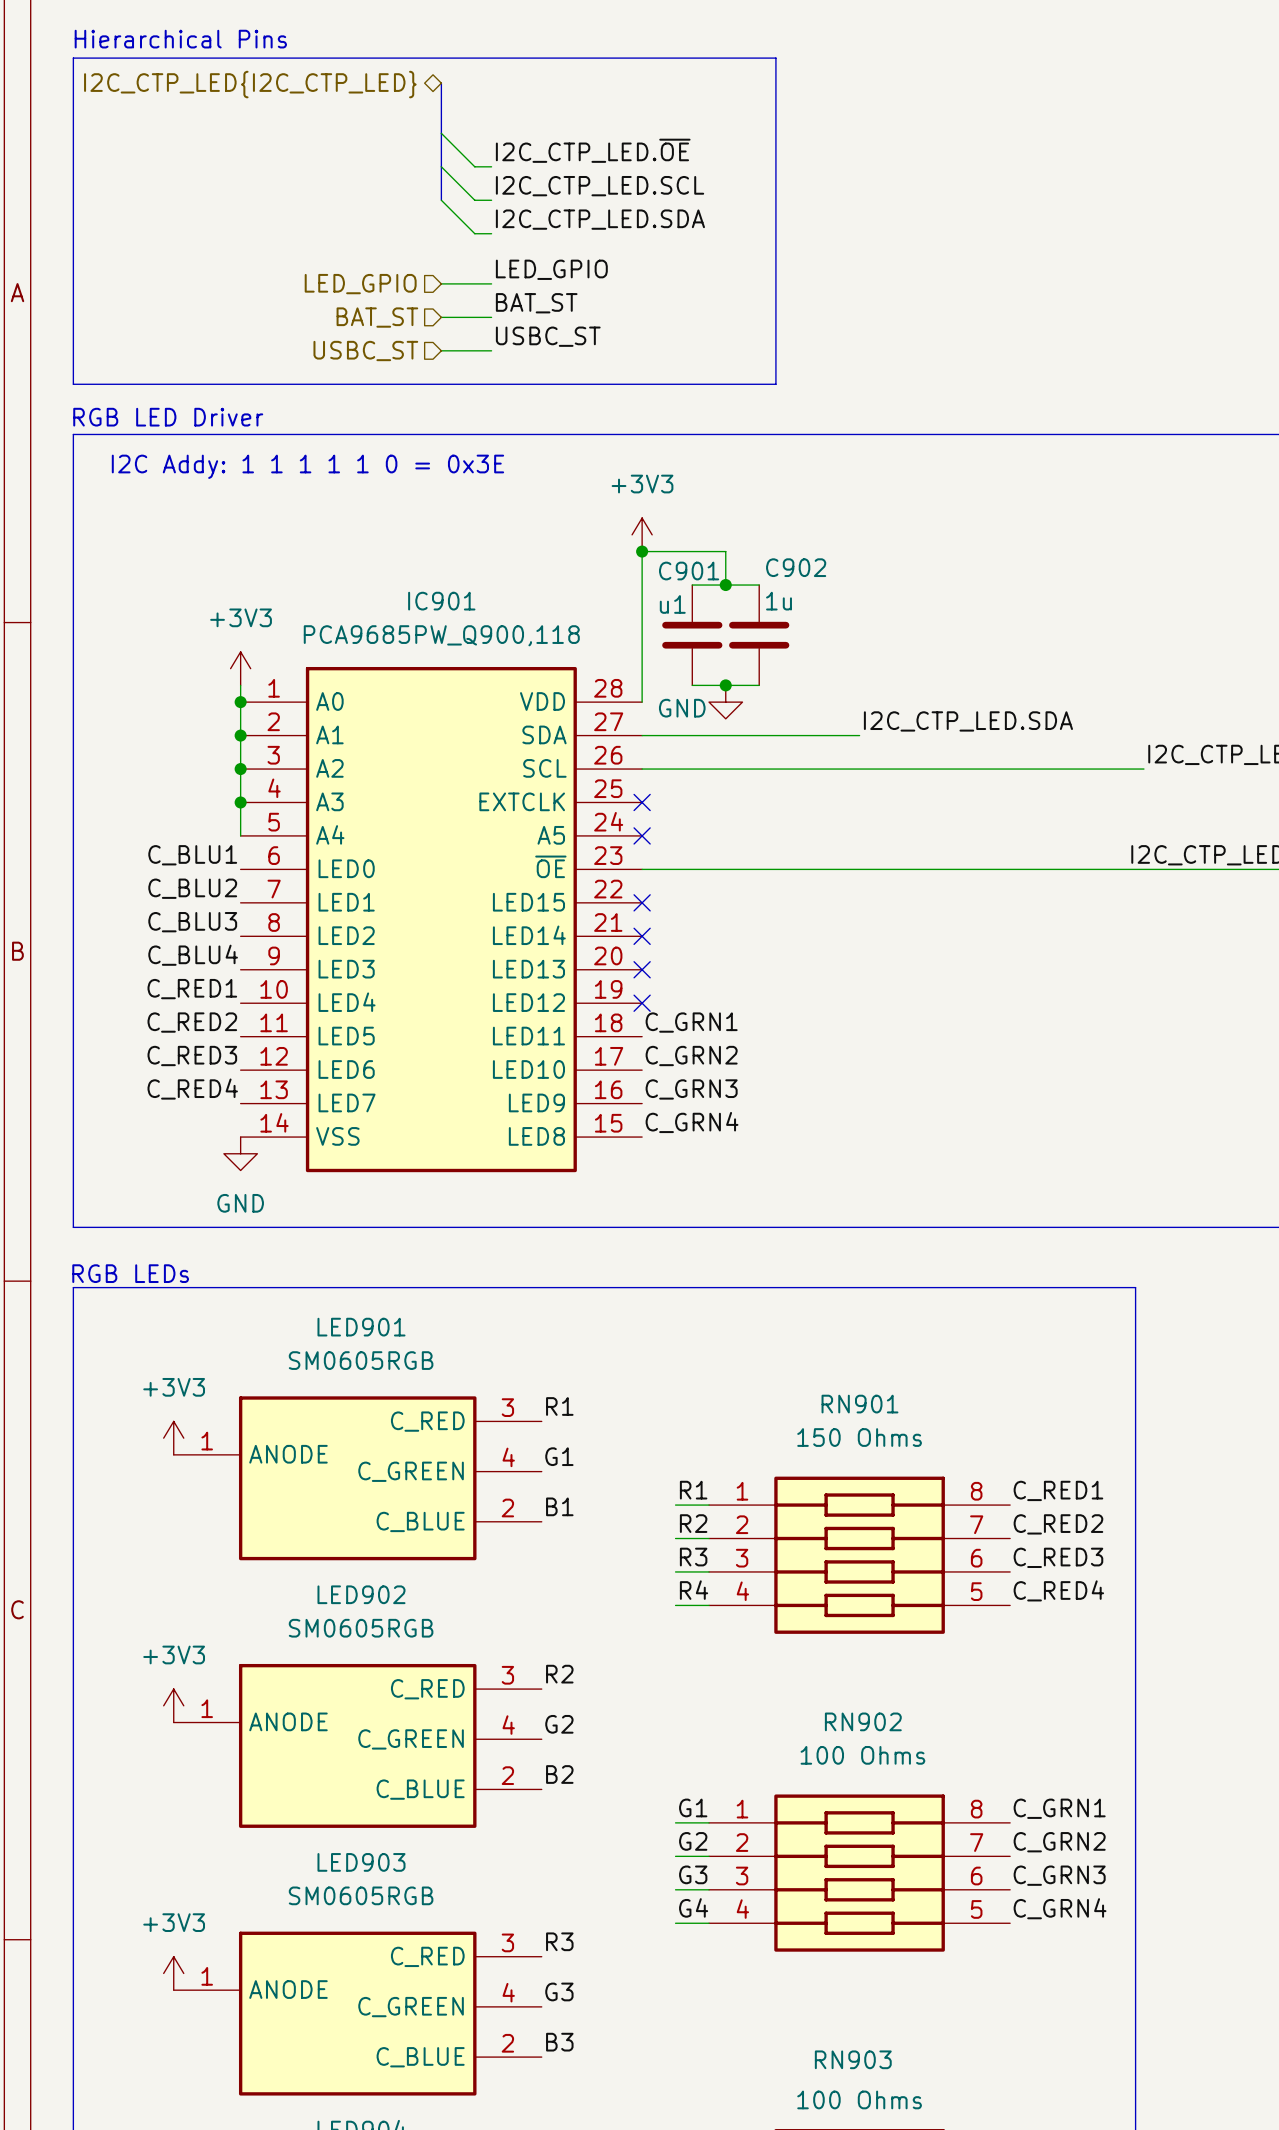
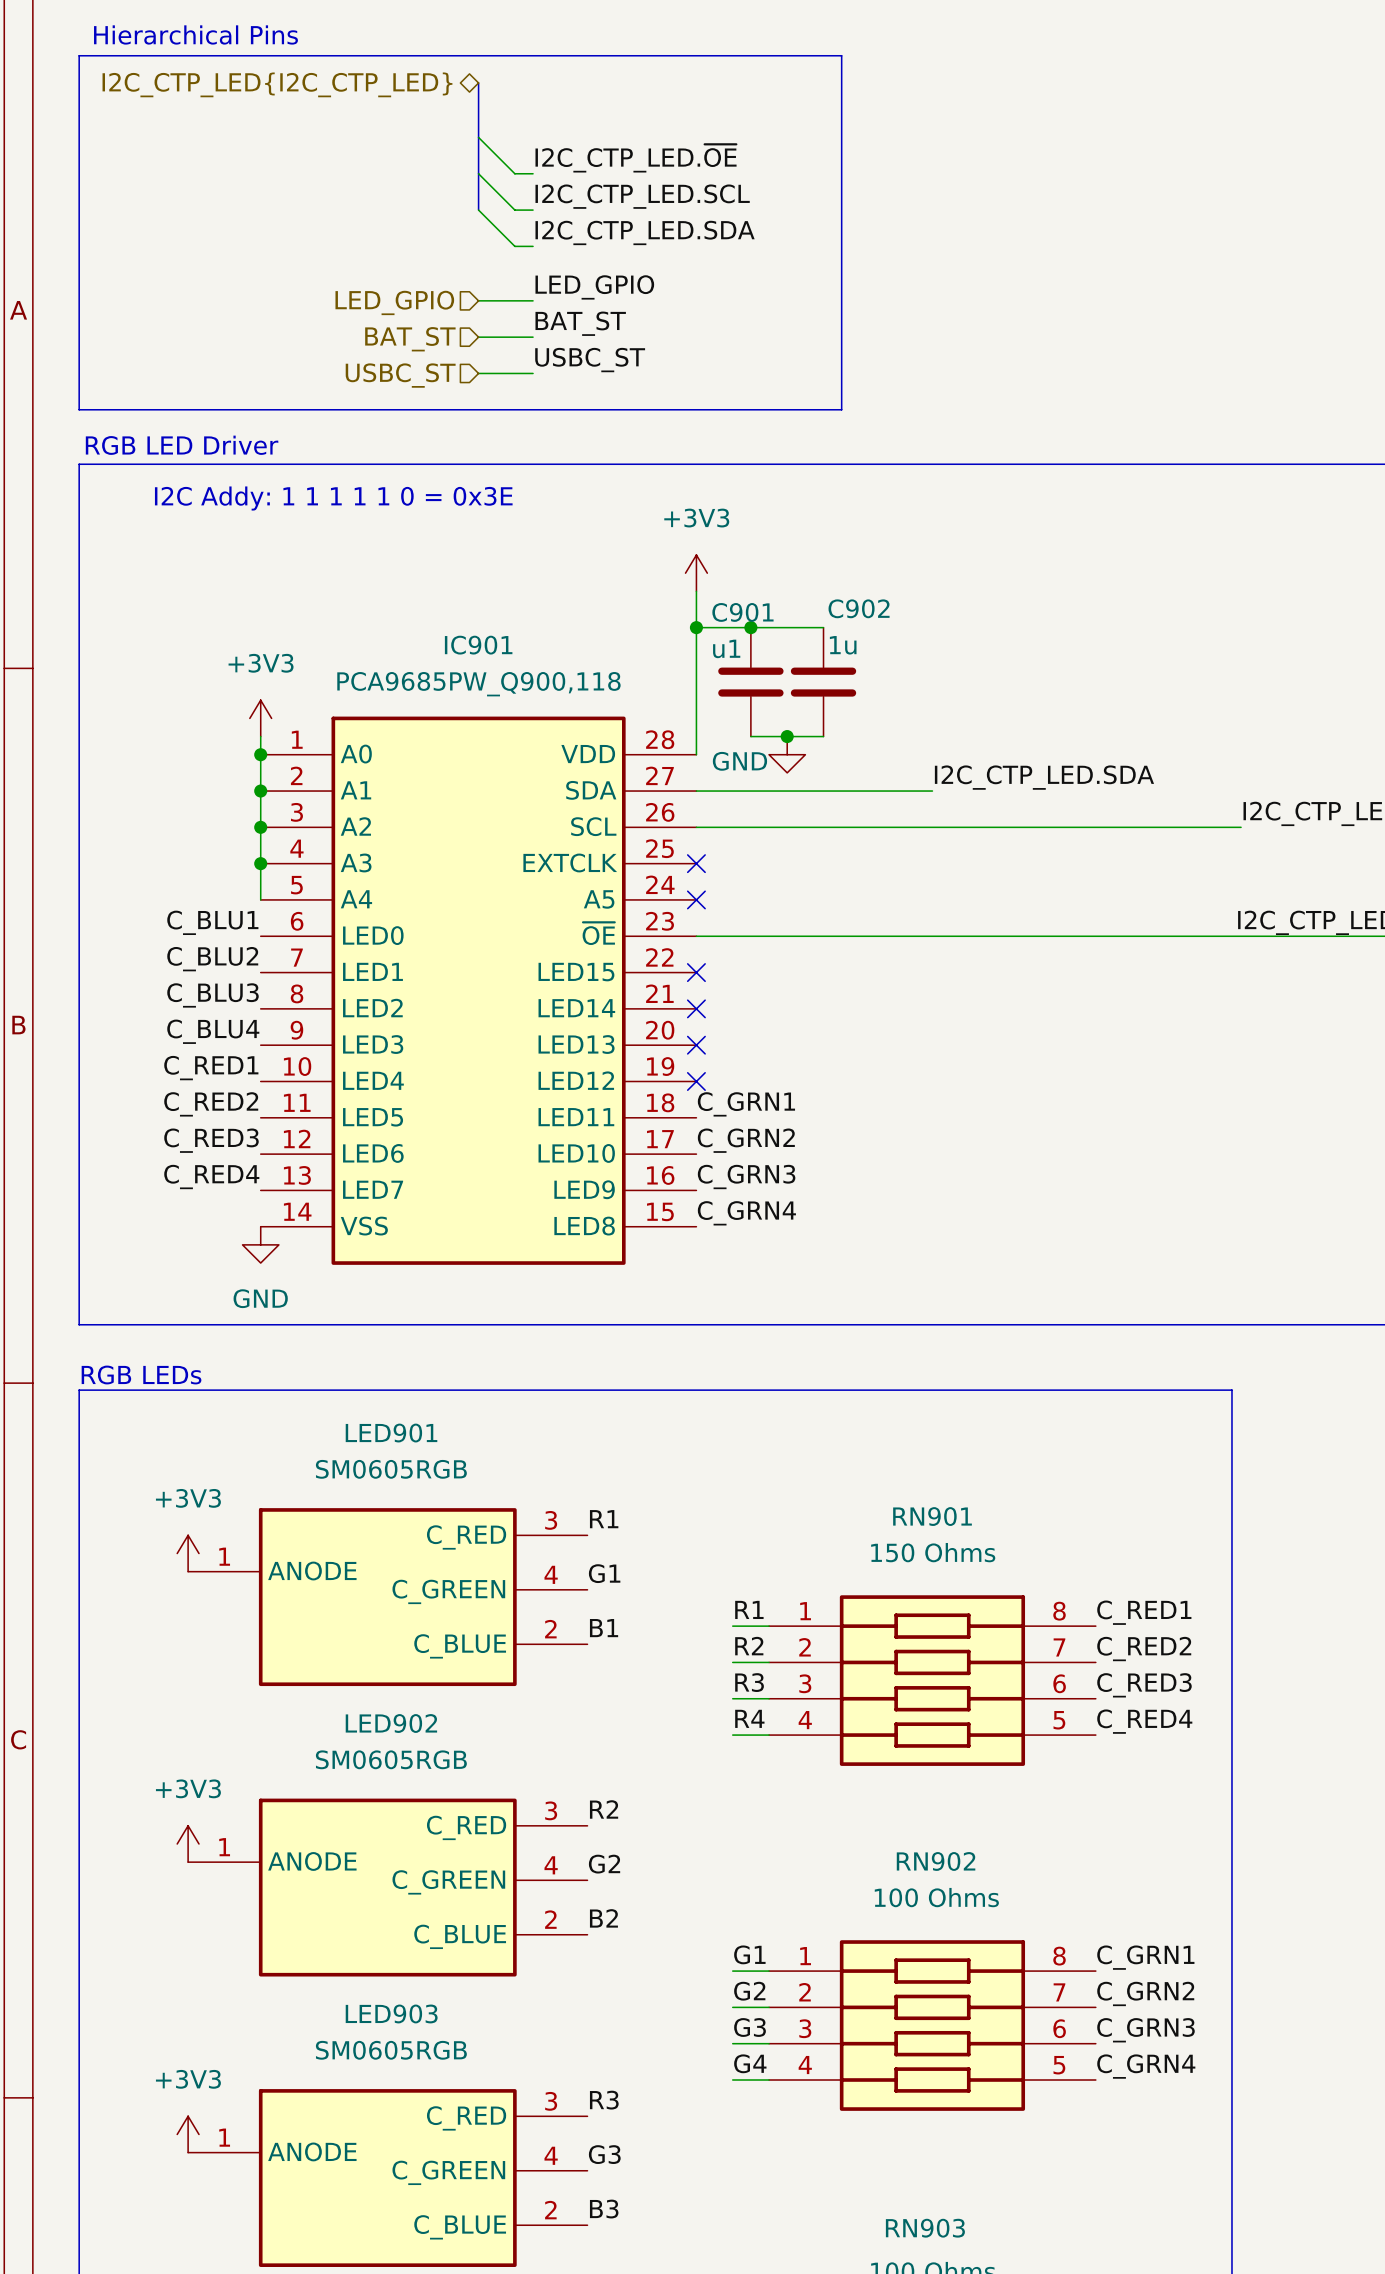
wire: (642, 551) (725, 551) (725, 585) -> none
junction: (642, 551) -> none
wire: none -> (696, 627) (750, 627)
junction: none -> (696, 627)
junction: none -> (750, 627)
junction: (725, 585) -> none

